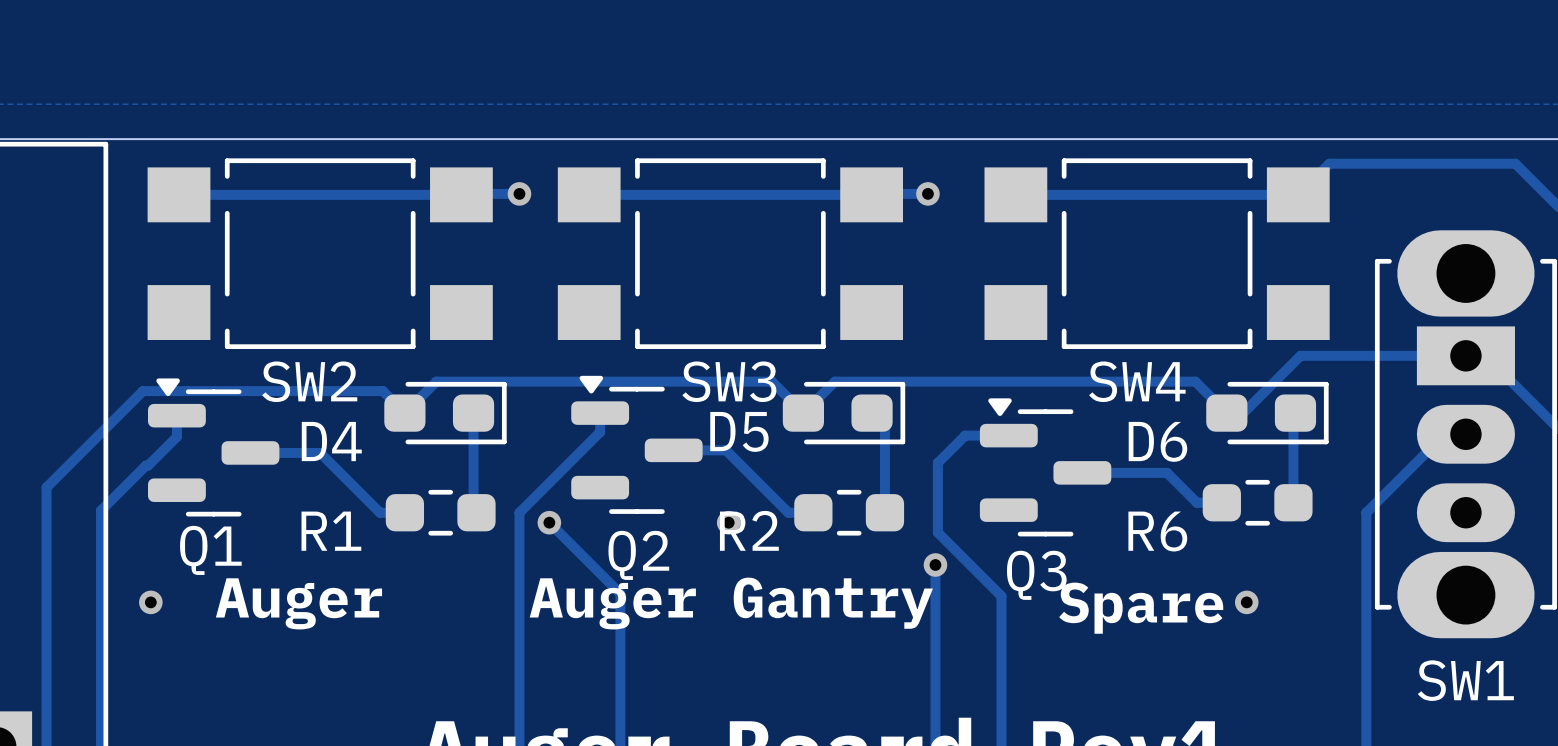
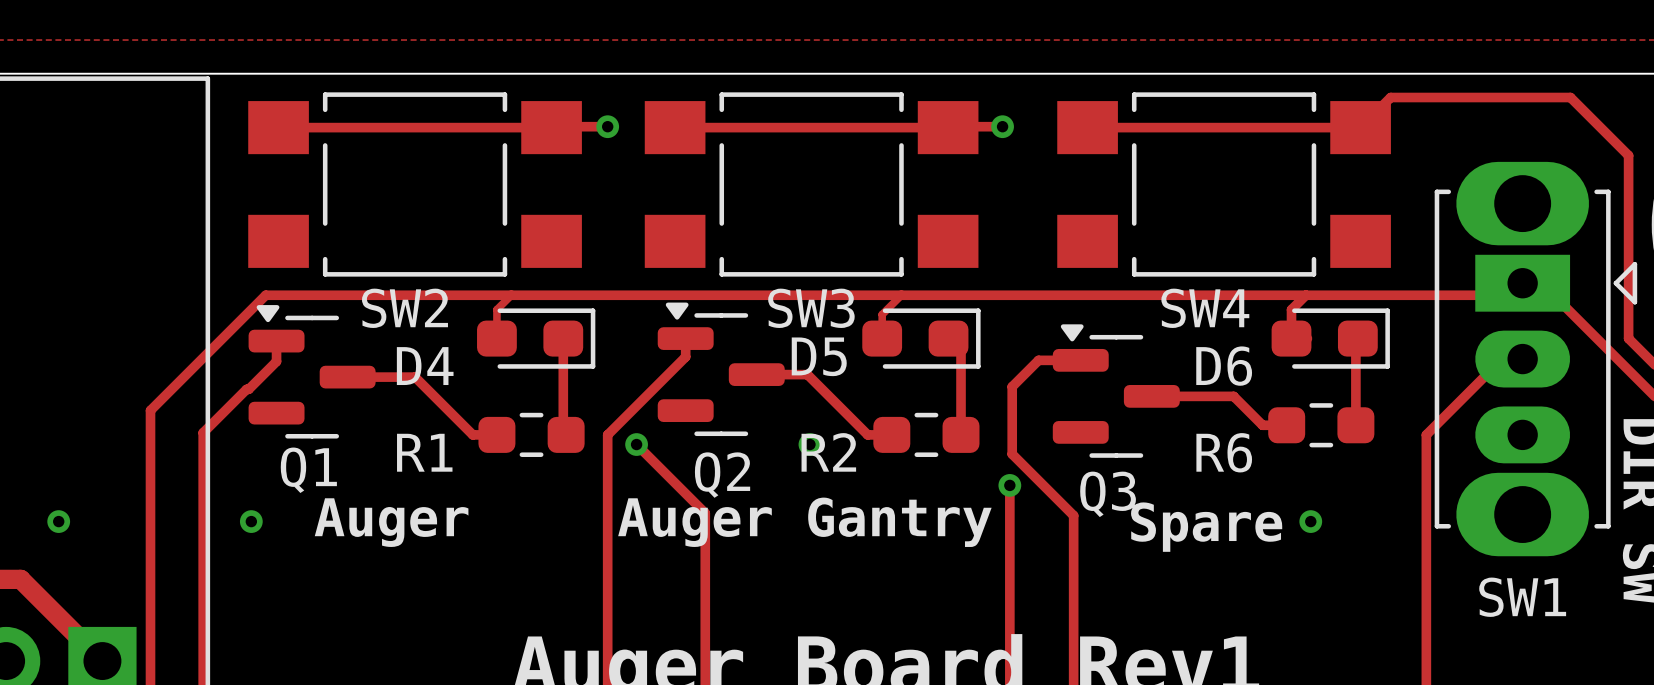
track: (1465, 355) (1300, 355) (1243, 413) -> none
track: none -> (511, 295) (496, 309) (496, 338)
track: none -> (901, 295) (882, 314) (882, 338)
track: none -> (1305, 295) (1291, 309) (1291, 338)
track: (142, 391) (382, 391) (404, 413) (436, 381) (771, 381) (803, 413) (834, 381) (1195, 381) (1226, 413) -> (243, 317) (265, 295) (1510, 295) (1522, 283)

